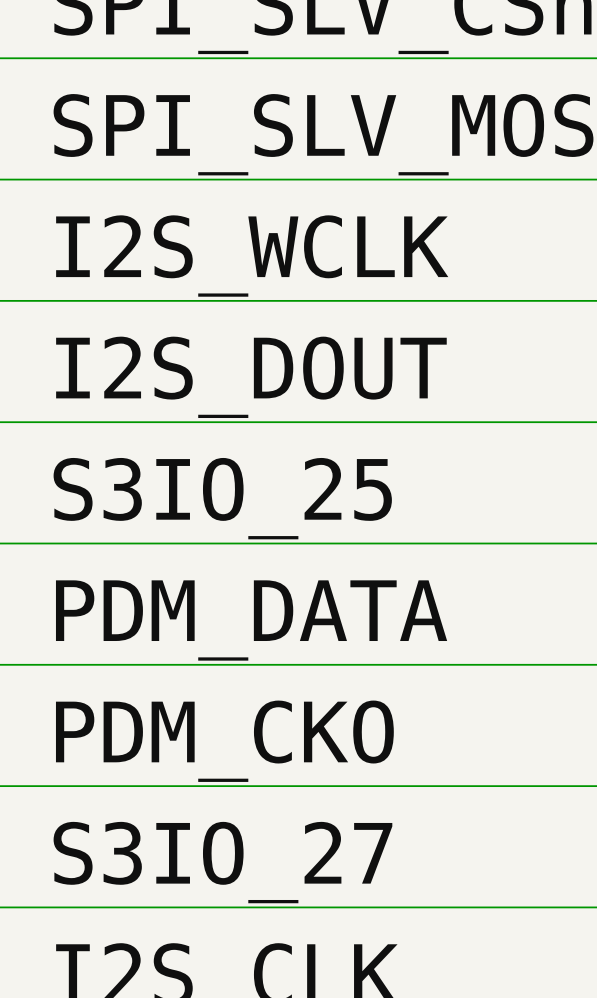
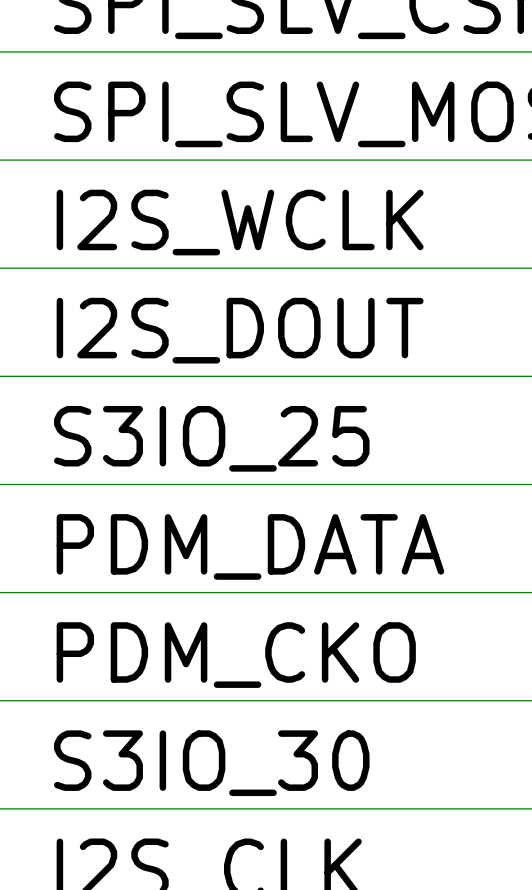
label: S3IO_27 (222, 862) -> S3IO_30 (211, 763)

